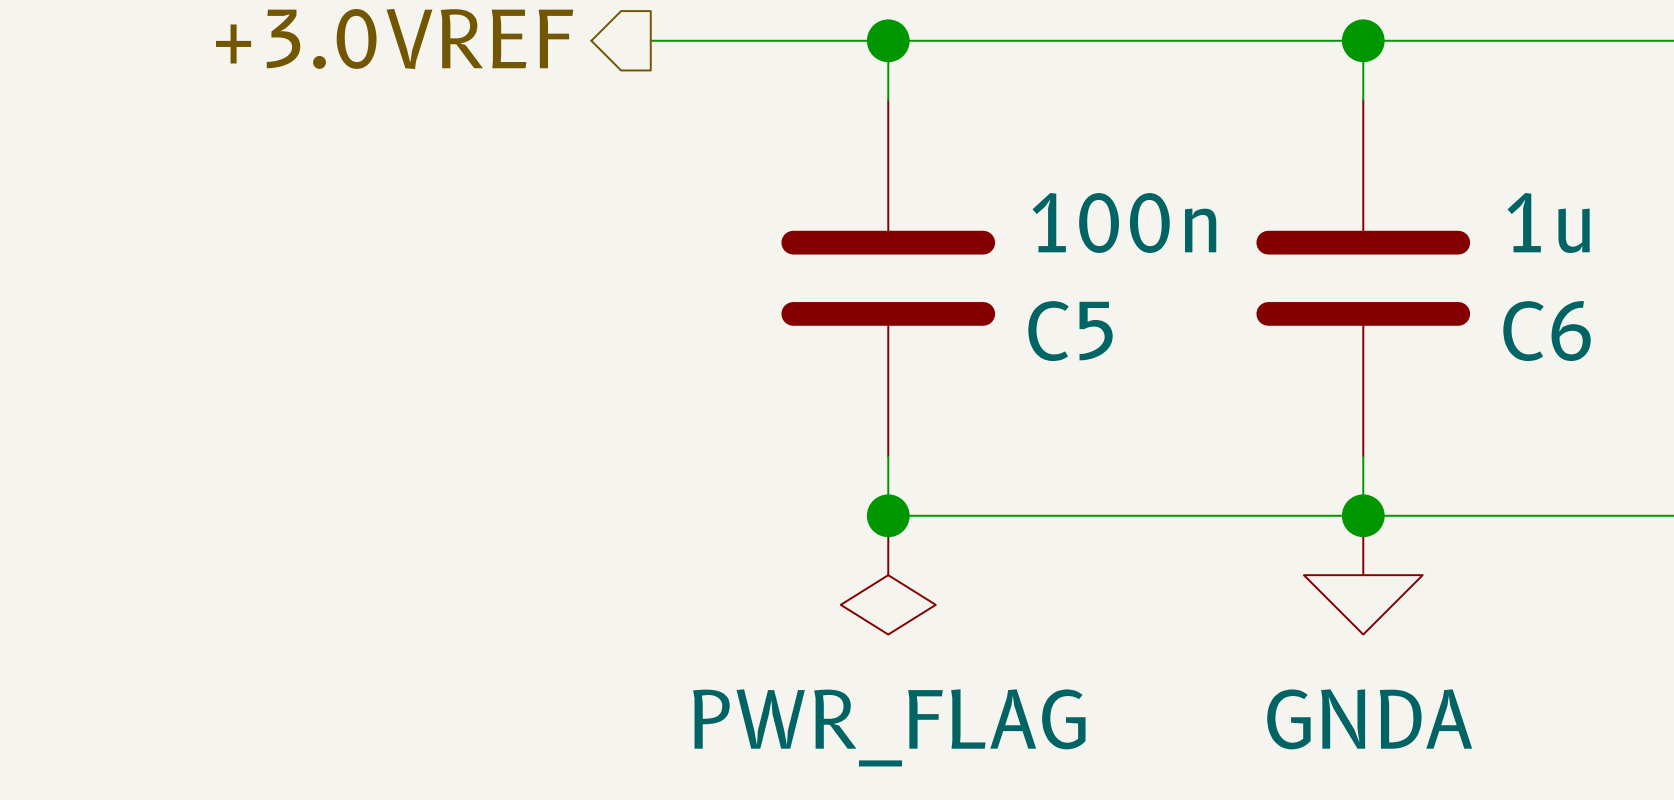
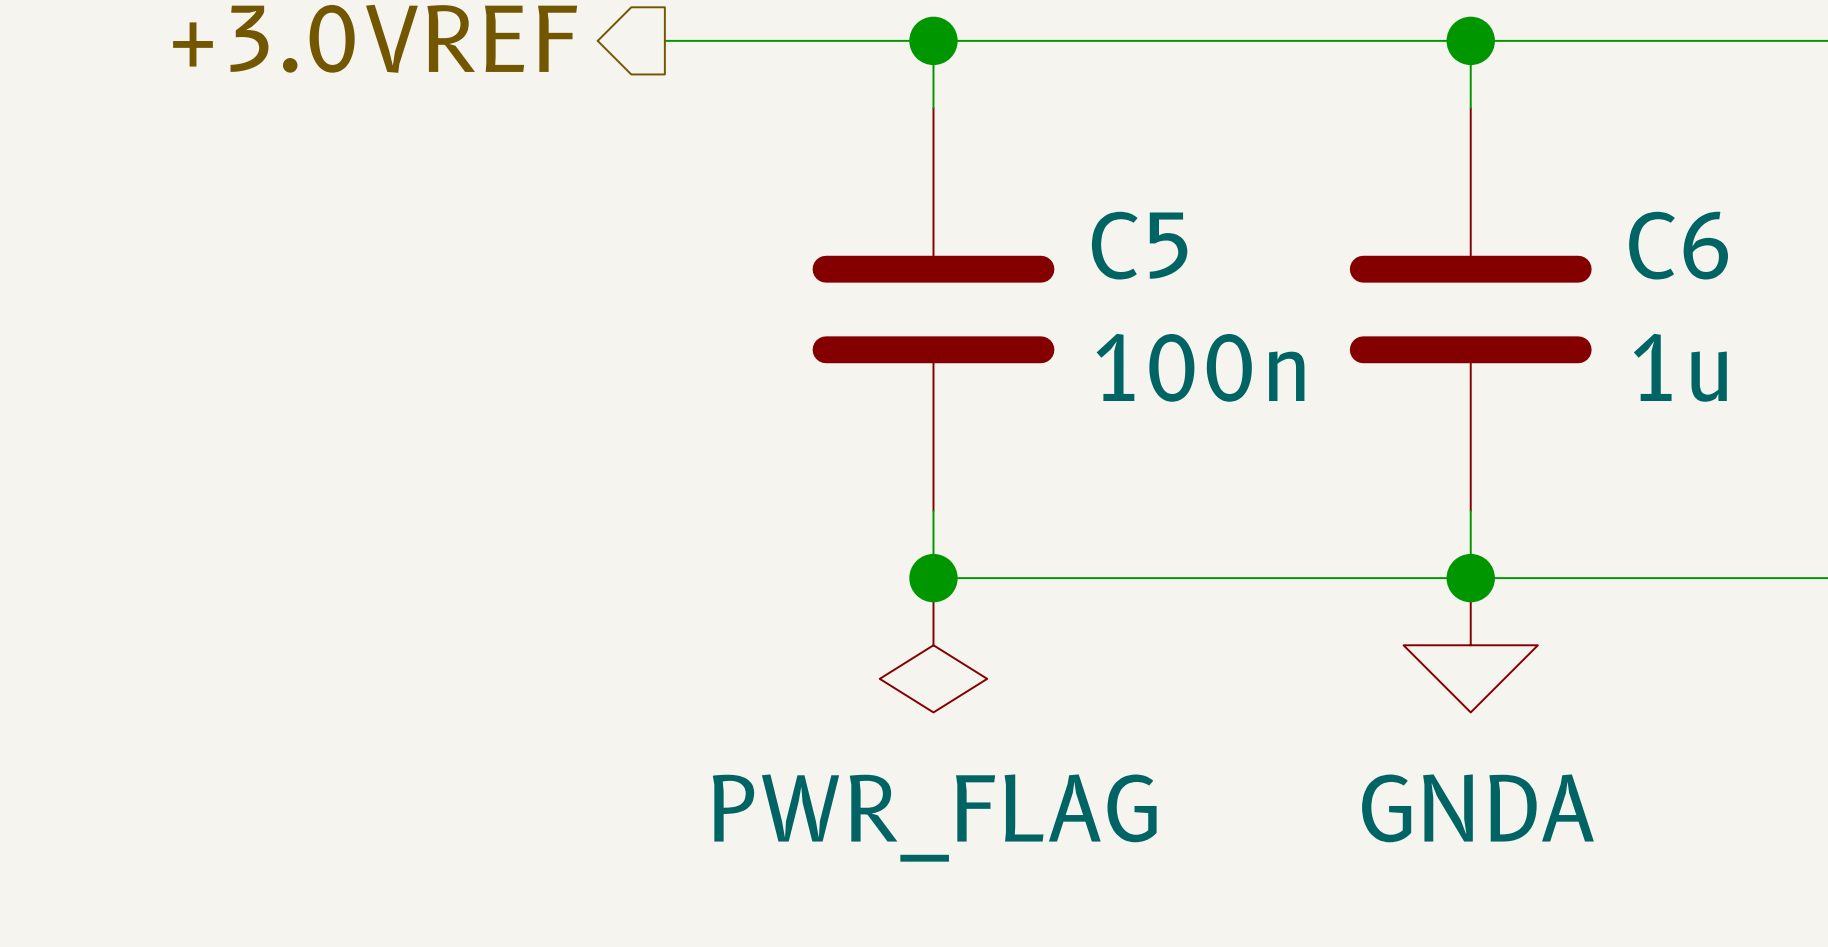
C5 value position: 100n (1124, 222) -> 100n (1200, 367)
C6 value position: 1u (1548, 222) -> 1u (1680, 367)
C5 name position: C5 (1070, 331) -> C5 (1139, 245)
C6 name position: C6 (1547, 331) -> C6 (1678, 245)

